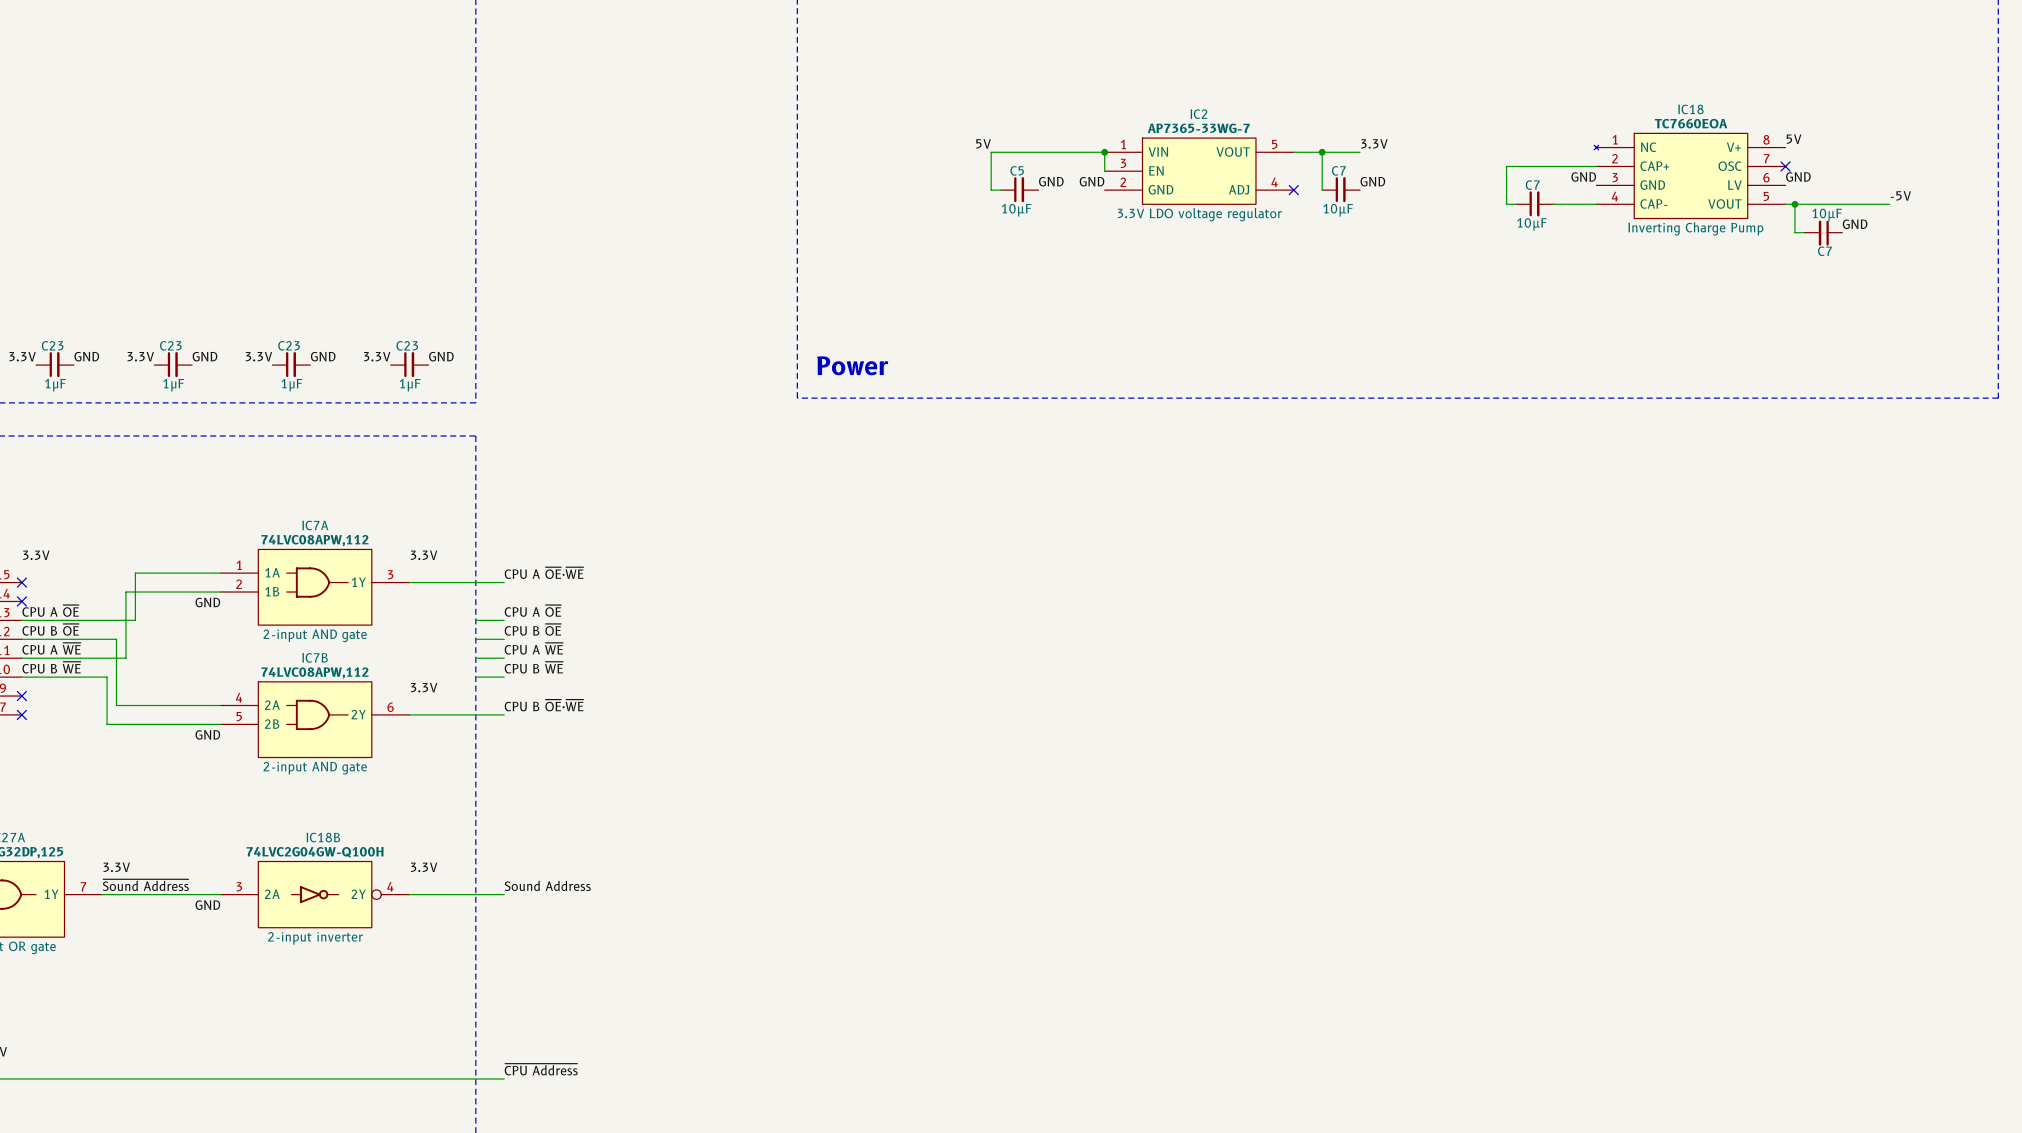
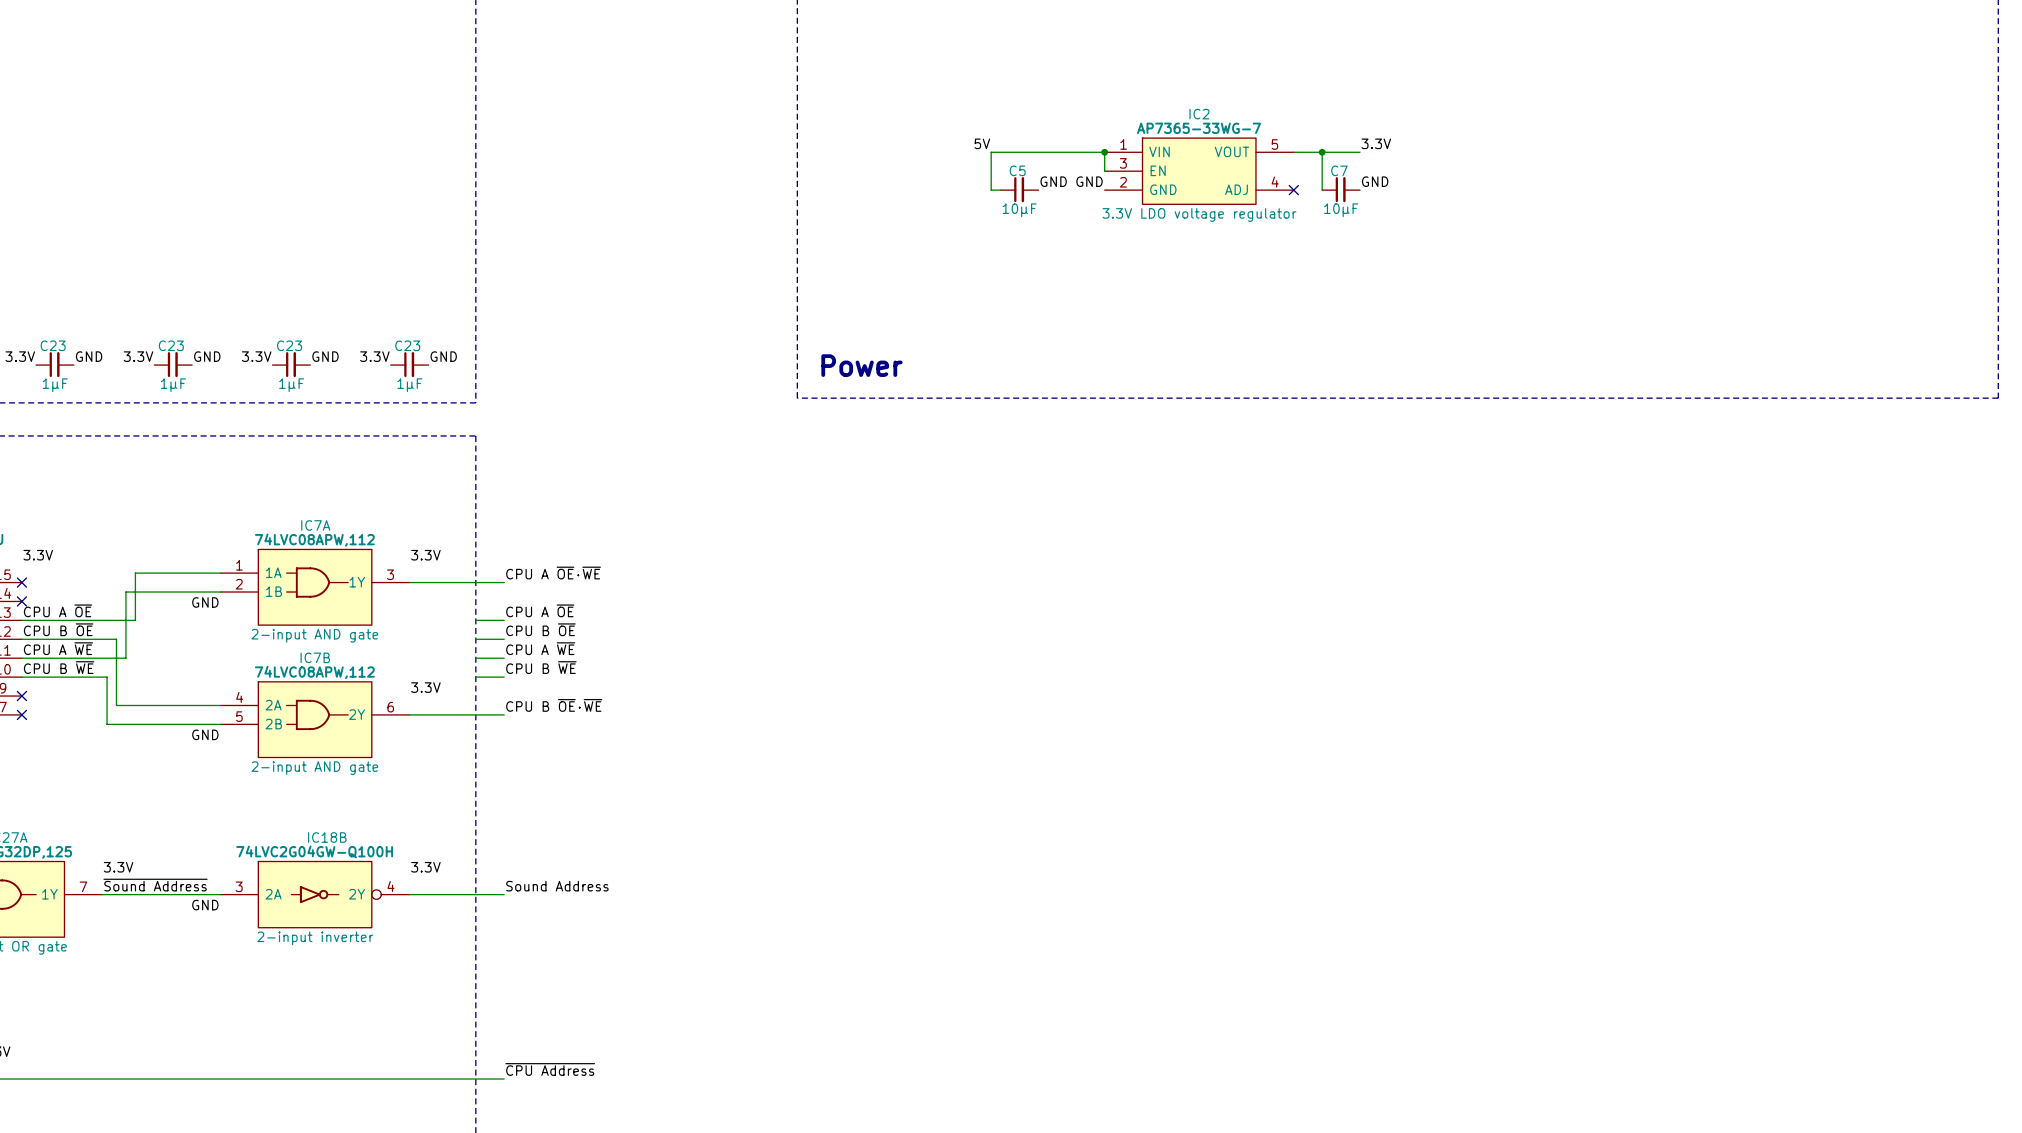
label: 5V (1794, 139) -> none
wire: (1596, 166) (1506, 166) (1506, 204) (1516, 204) -> none
no-connect mark: (1785, 166) -> none
IC18: TC7660EOA (1689, 175) -> none
label: GND (1583, 177) -> none
label: GND (1798, 177) -> none
label: -5V (1900, 195) -> none
C7: 10µF (1534, 203) -> none
wire: (1553, 204) (1596, 204) -> none
wire: (1785, 204) (1889, 204) -> none
wire: (1794, 204) (1794, 232) (1804, 232) -> none
junction: (1794, 204) -> none
label: GND (1855, 224) -> none
C7: 10µF (1823, 233) -> none

